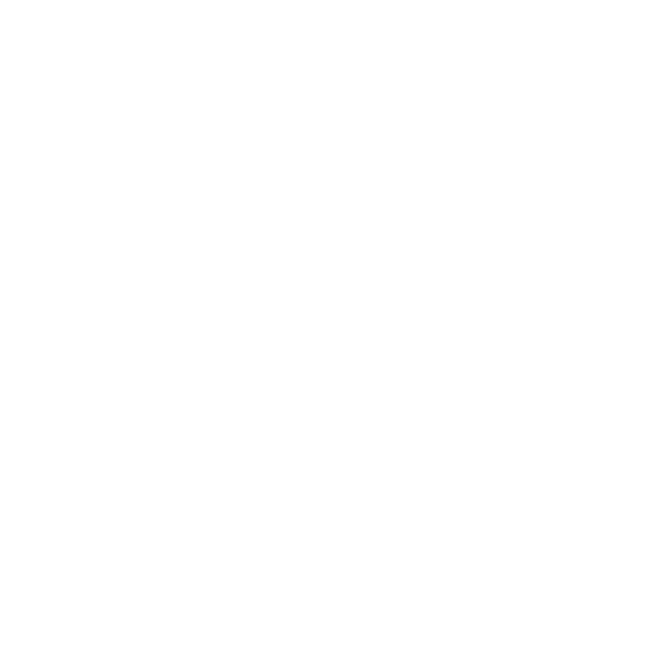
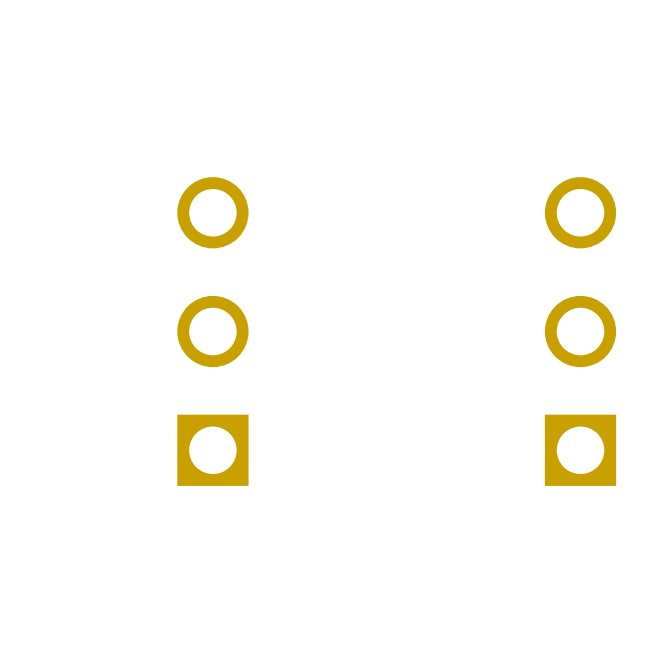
part: none -> (212, 331)
part: none -> (580, 331)

